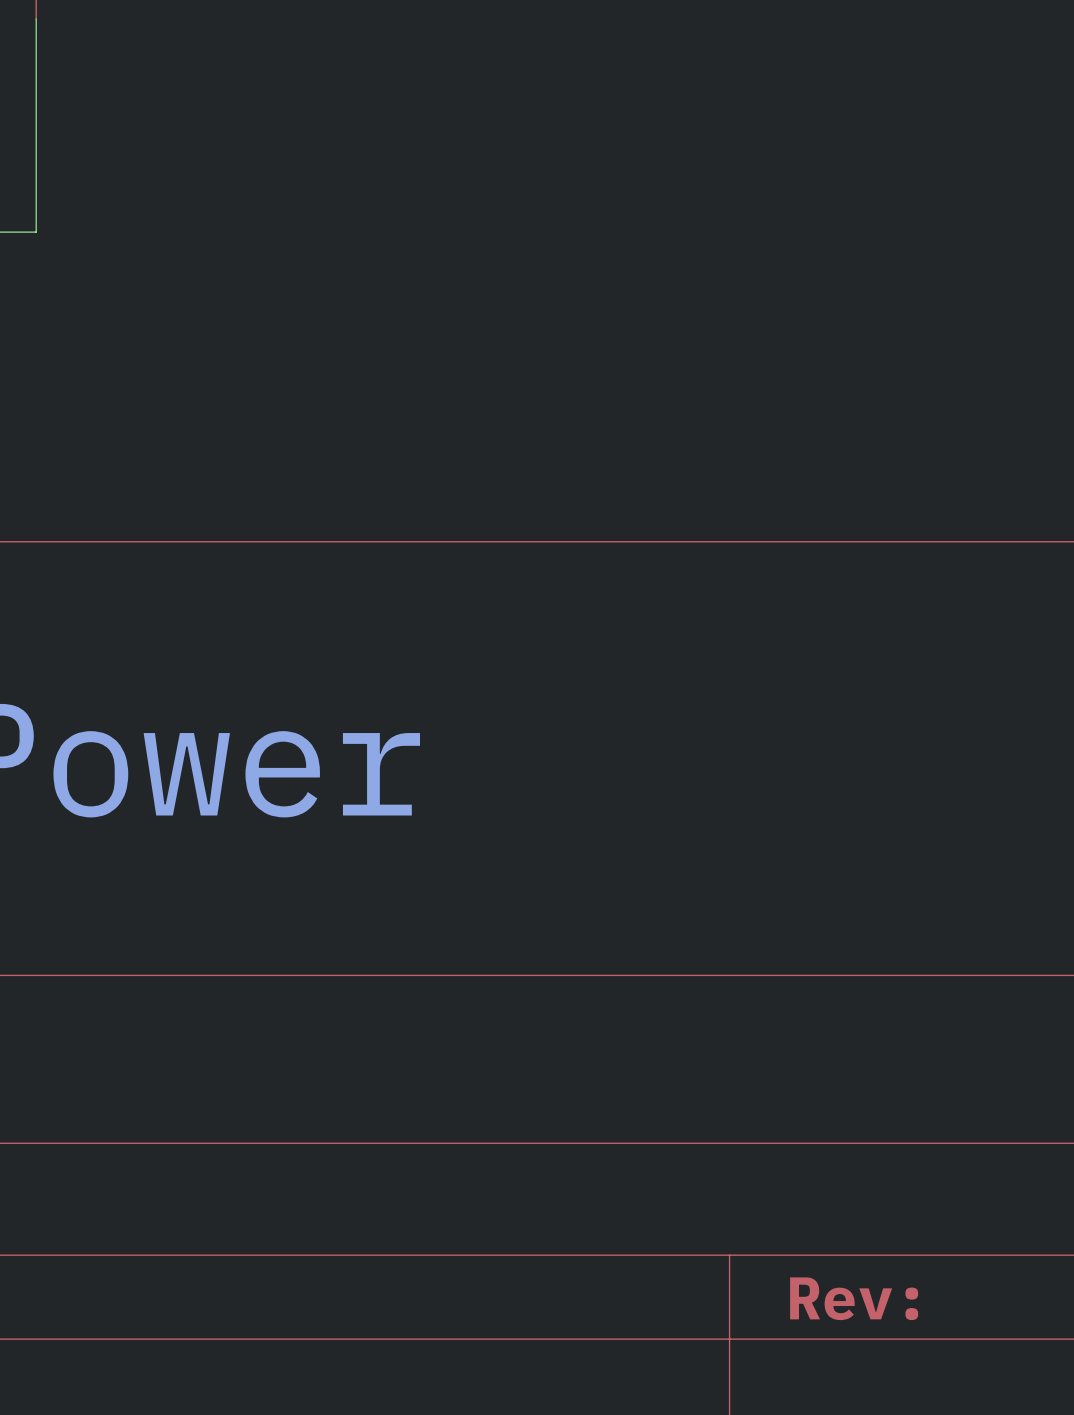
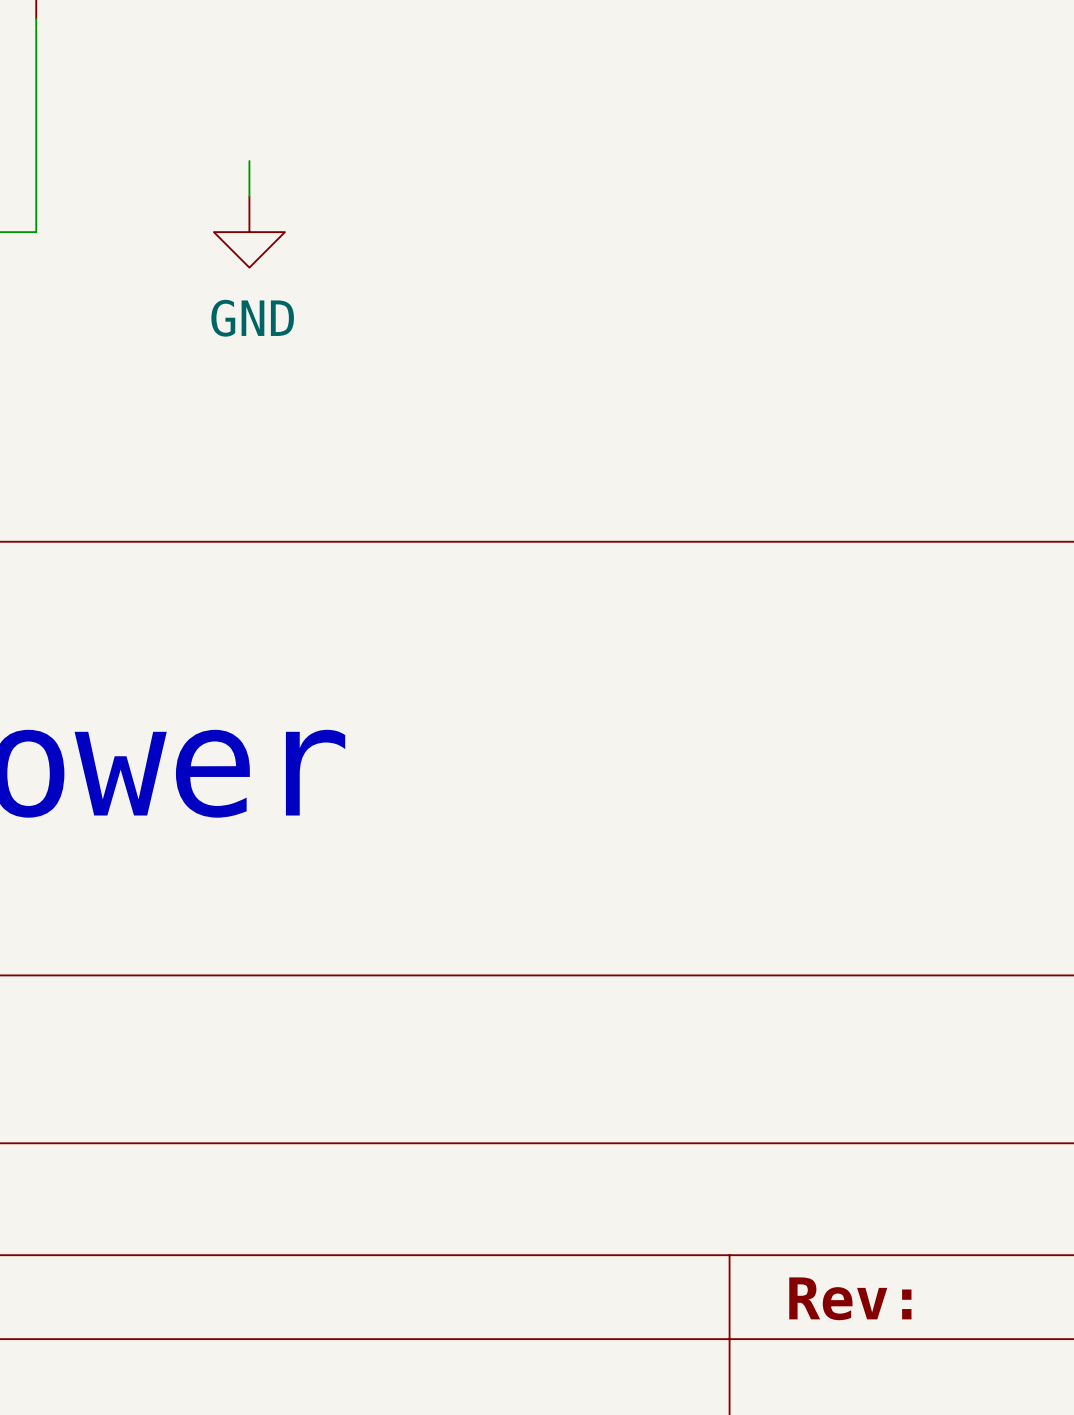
wire: none -> (249, 161) (249, 196)
power symbol: none -> GND (249, 232)

